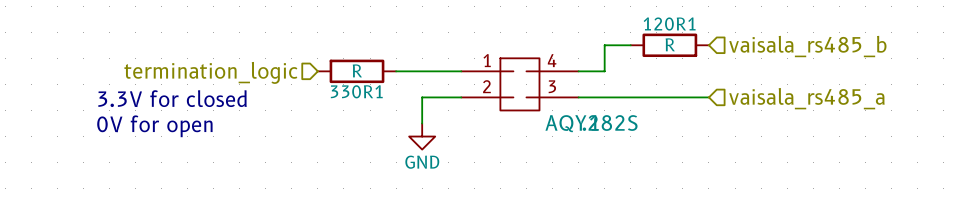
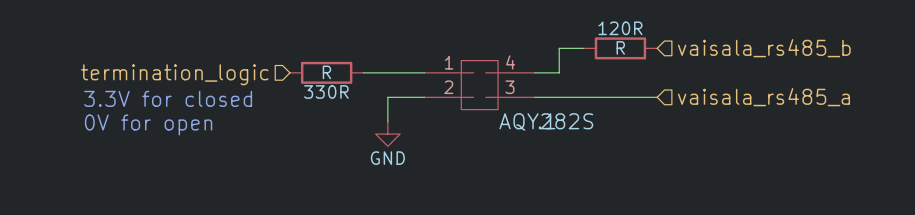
120R1 name: 120R1 (669, 24) -> 120R (620, 28)
330R1 name: 330R1 (356, 91) -> 330R (326, 91)

